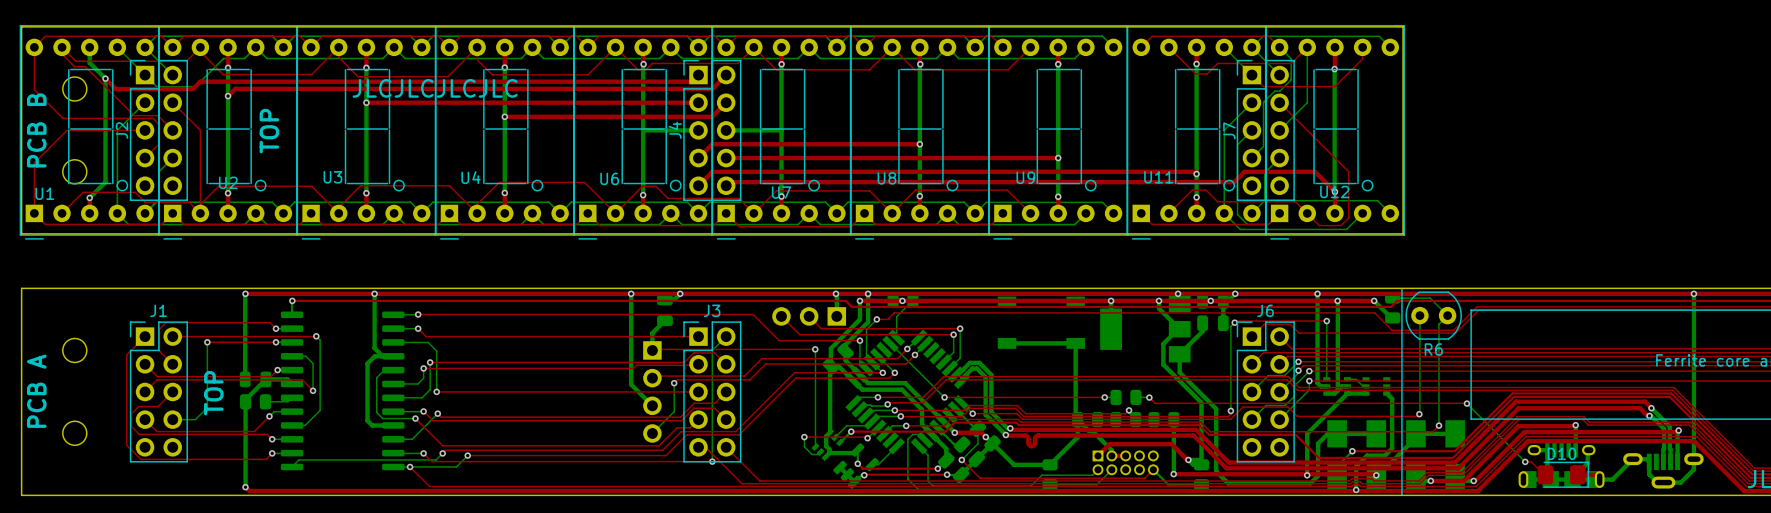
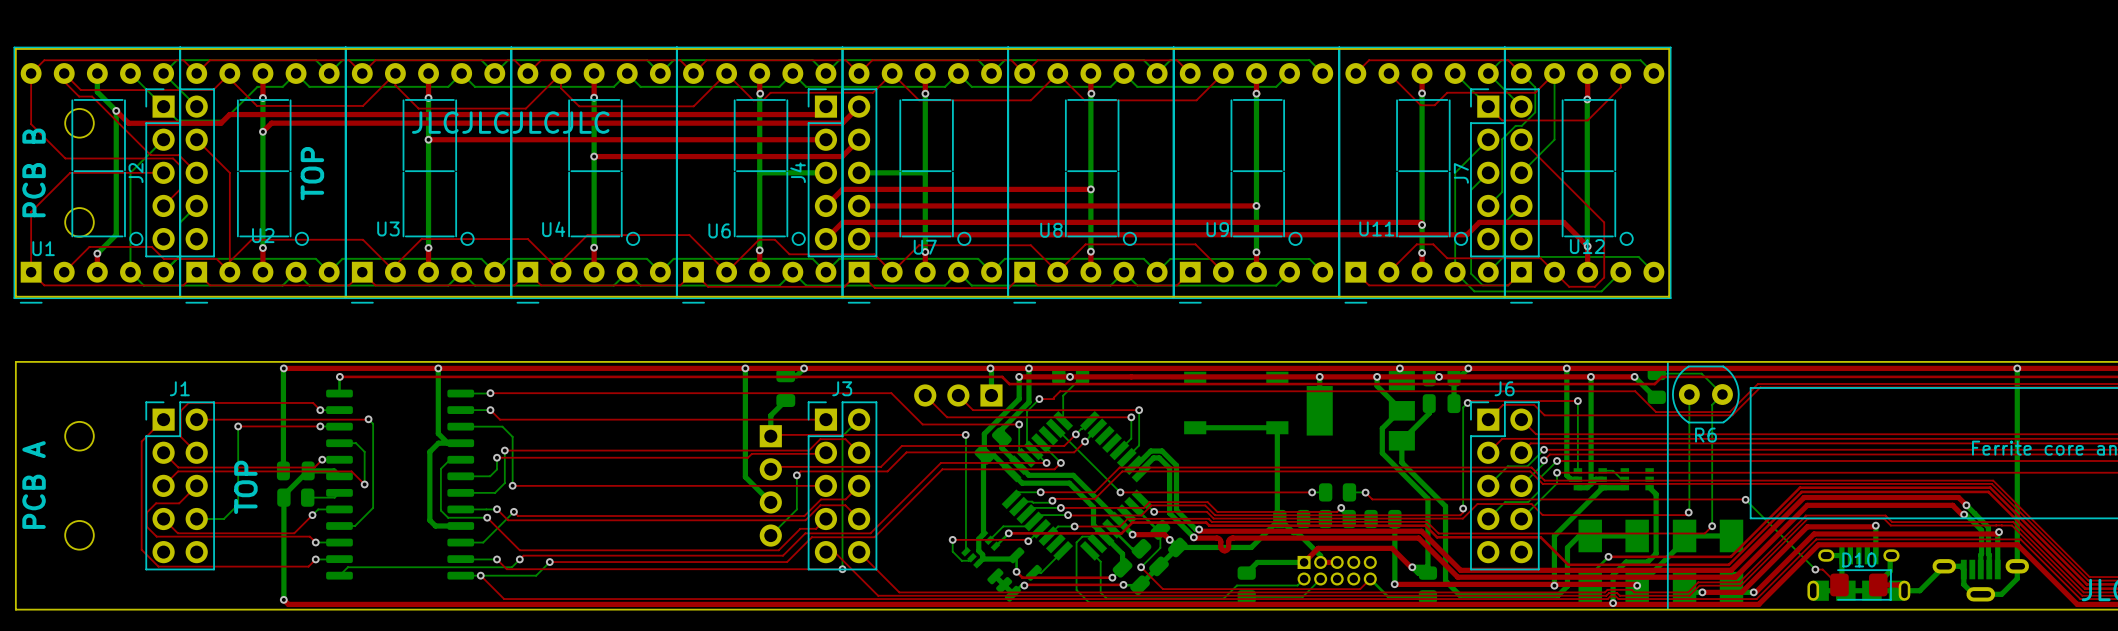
bottom track: (1077, 419) (1077, 437) (1058, 455) -> (1304, 562) (1257, 562)
bottom track: (992, 443) (1013, 464) (1050, 464) -> (1177, 547) (1251, 547) (1279, 519)

